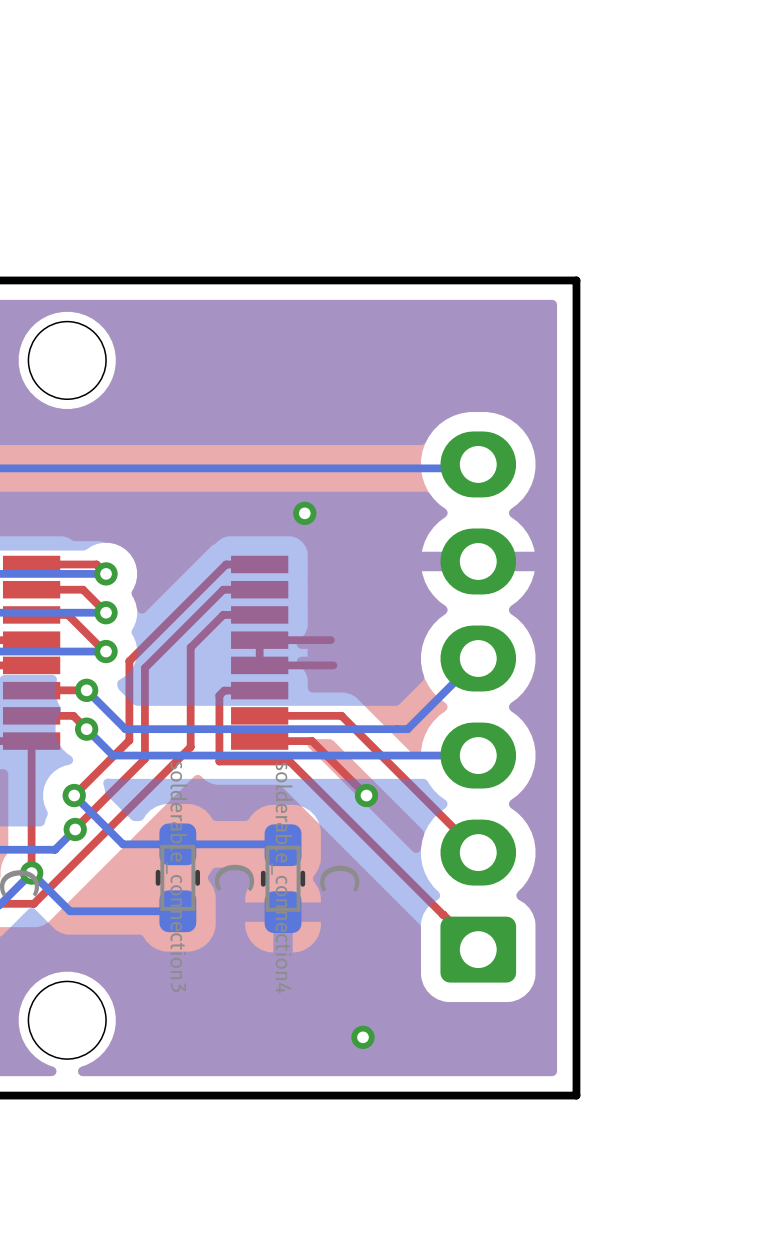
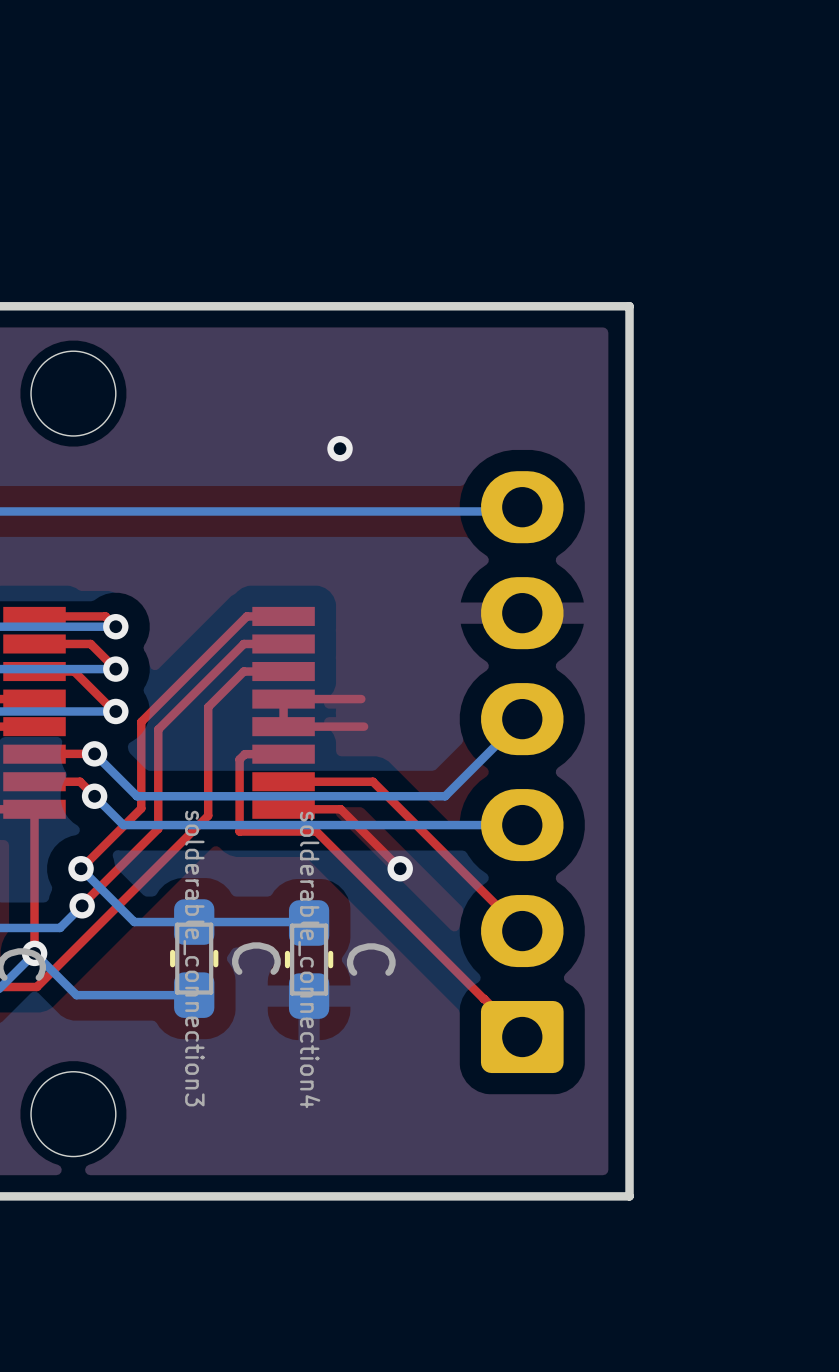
via position: (304, 513) -> (340, 448)
via: (362, 1037) -> none

